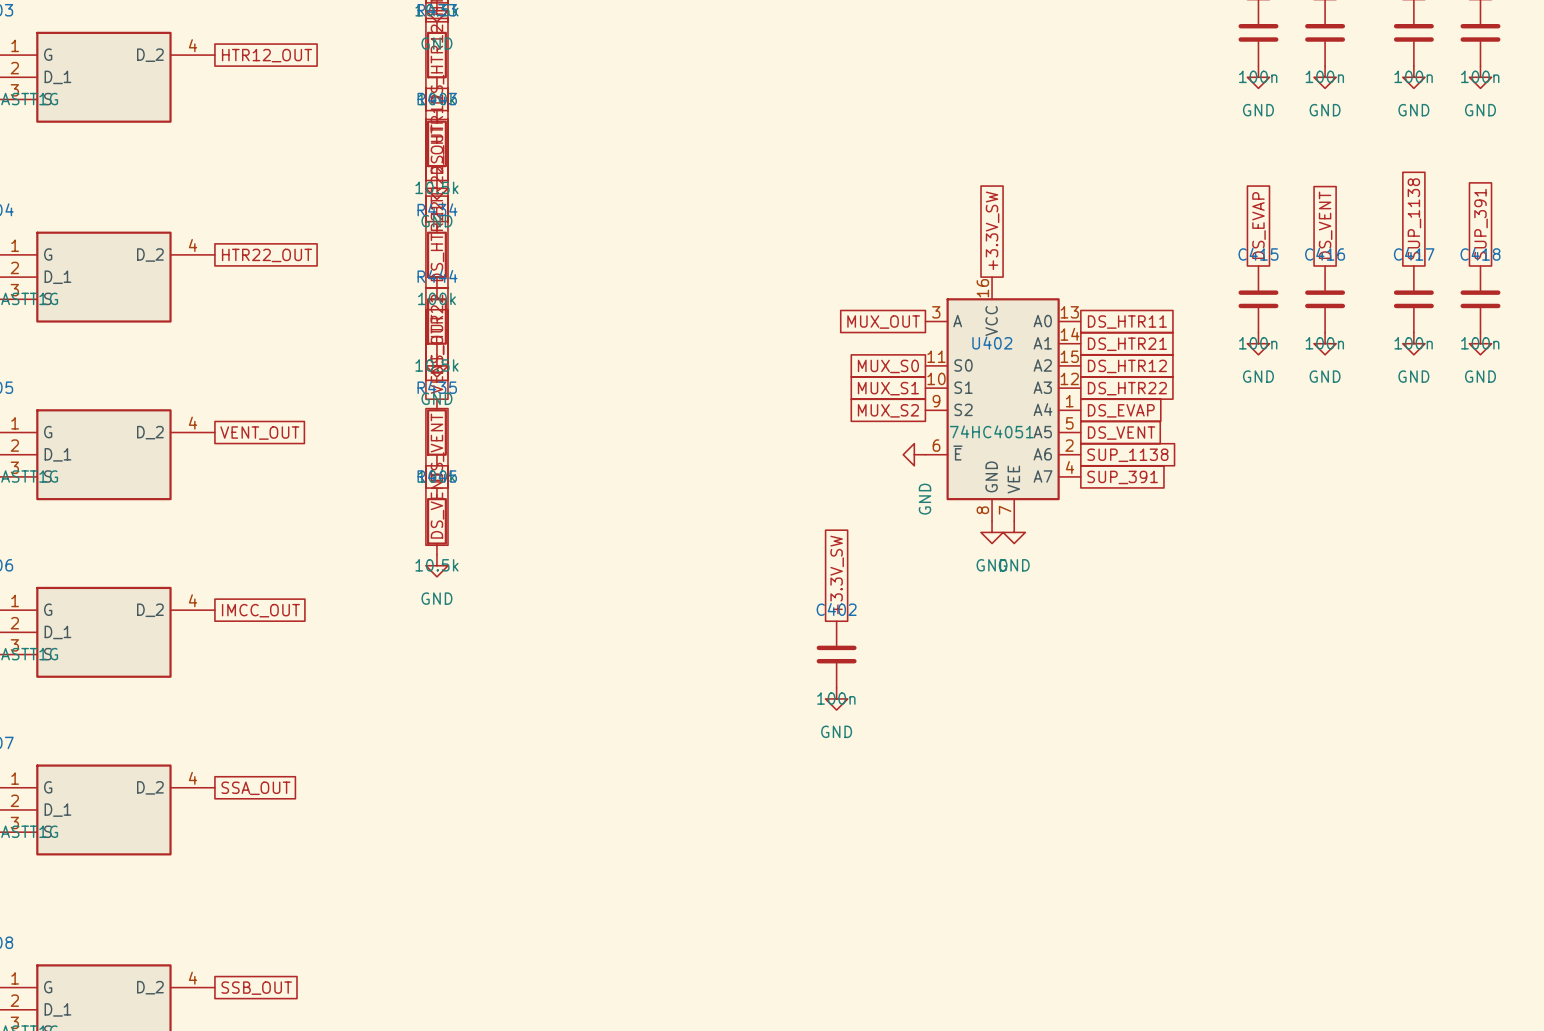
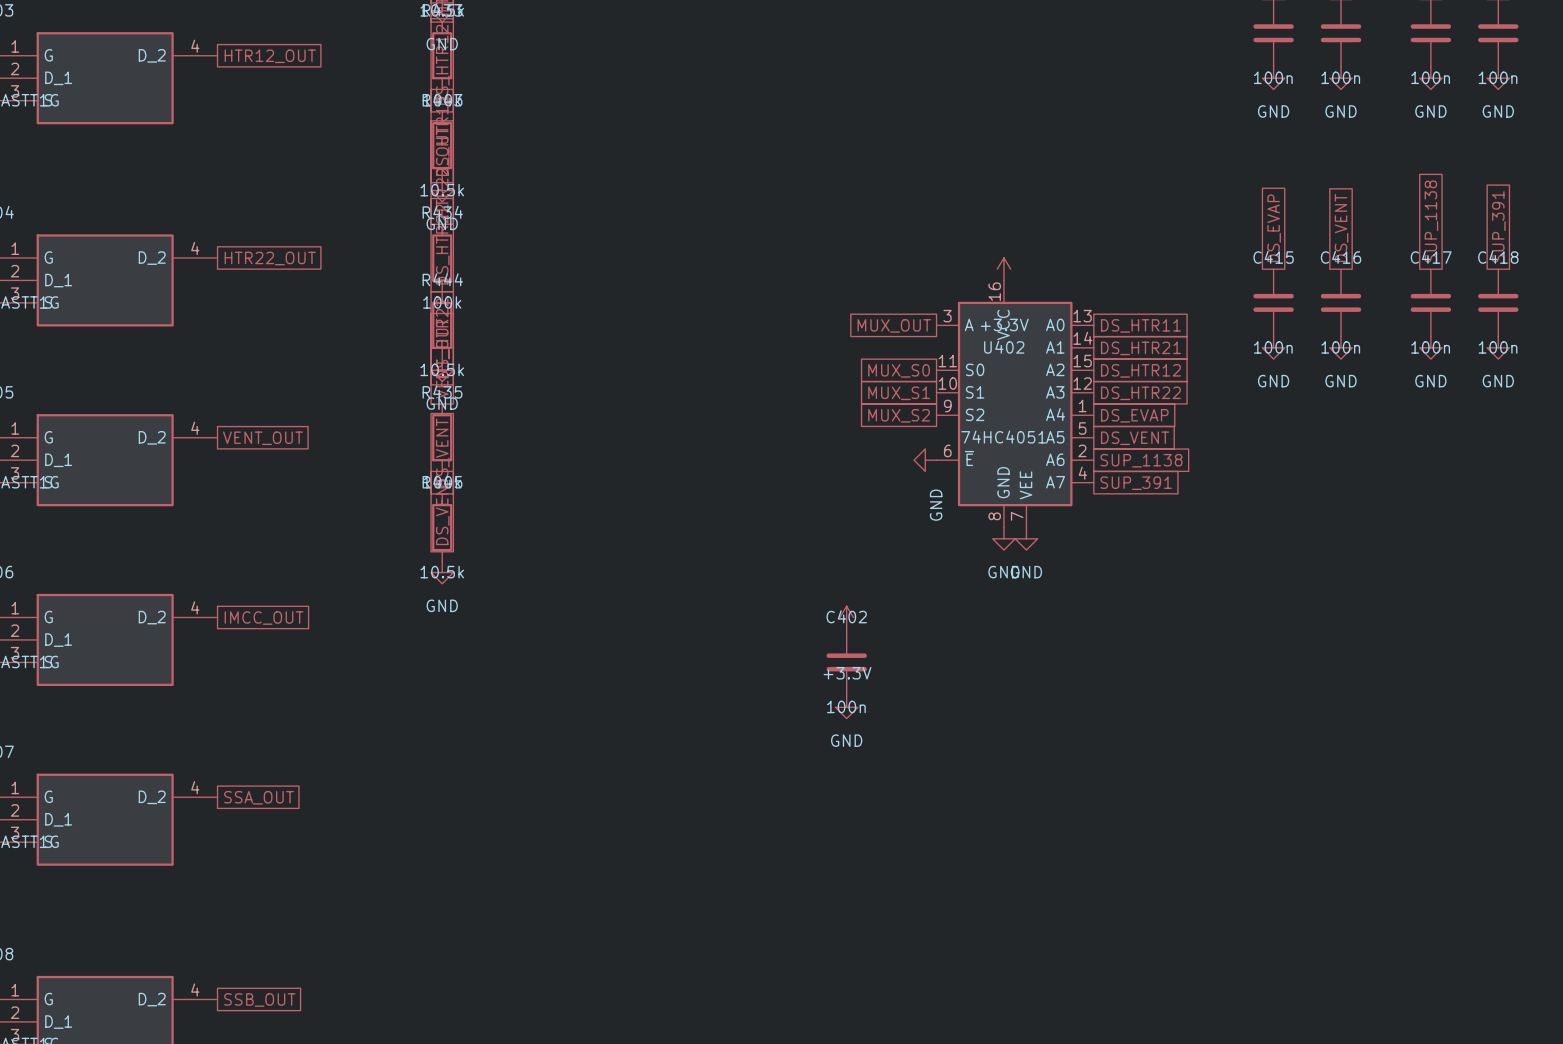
global label: +3.3V_SW (992, 230) -> none
power symbol: none -> +3.3V (1003, 269)
global label: +3.3V_SW (837, 574) -> none
power symbol: none -> +3.3V (846, 617)

